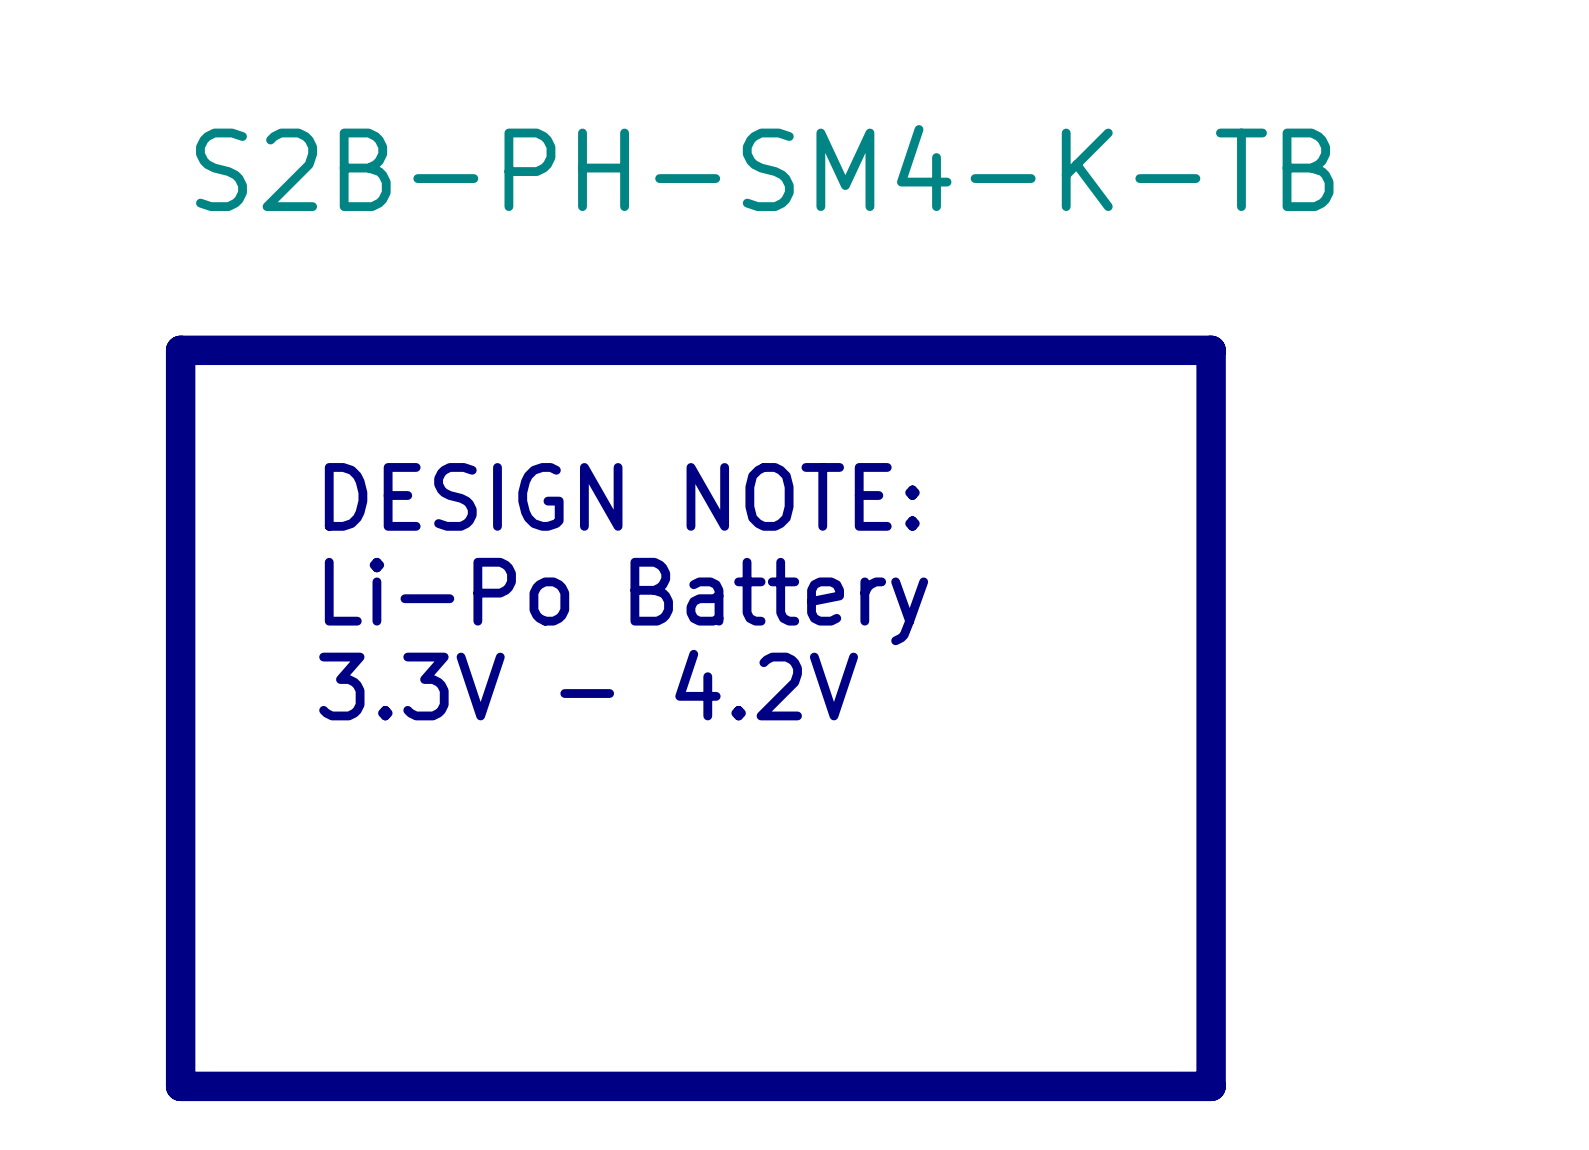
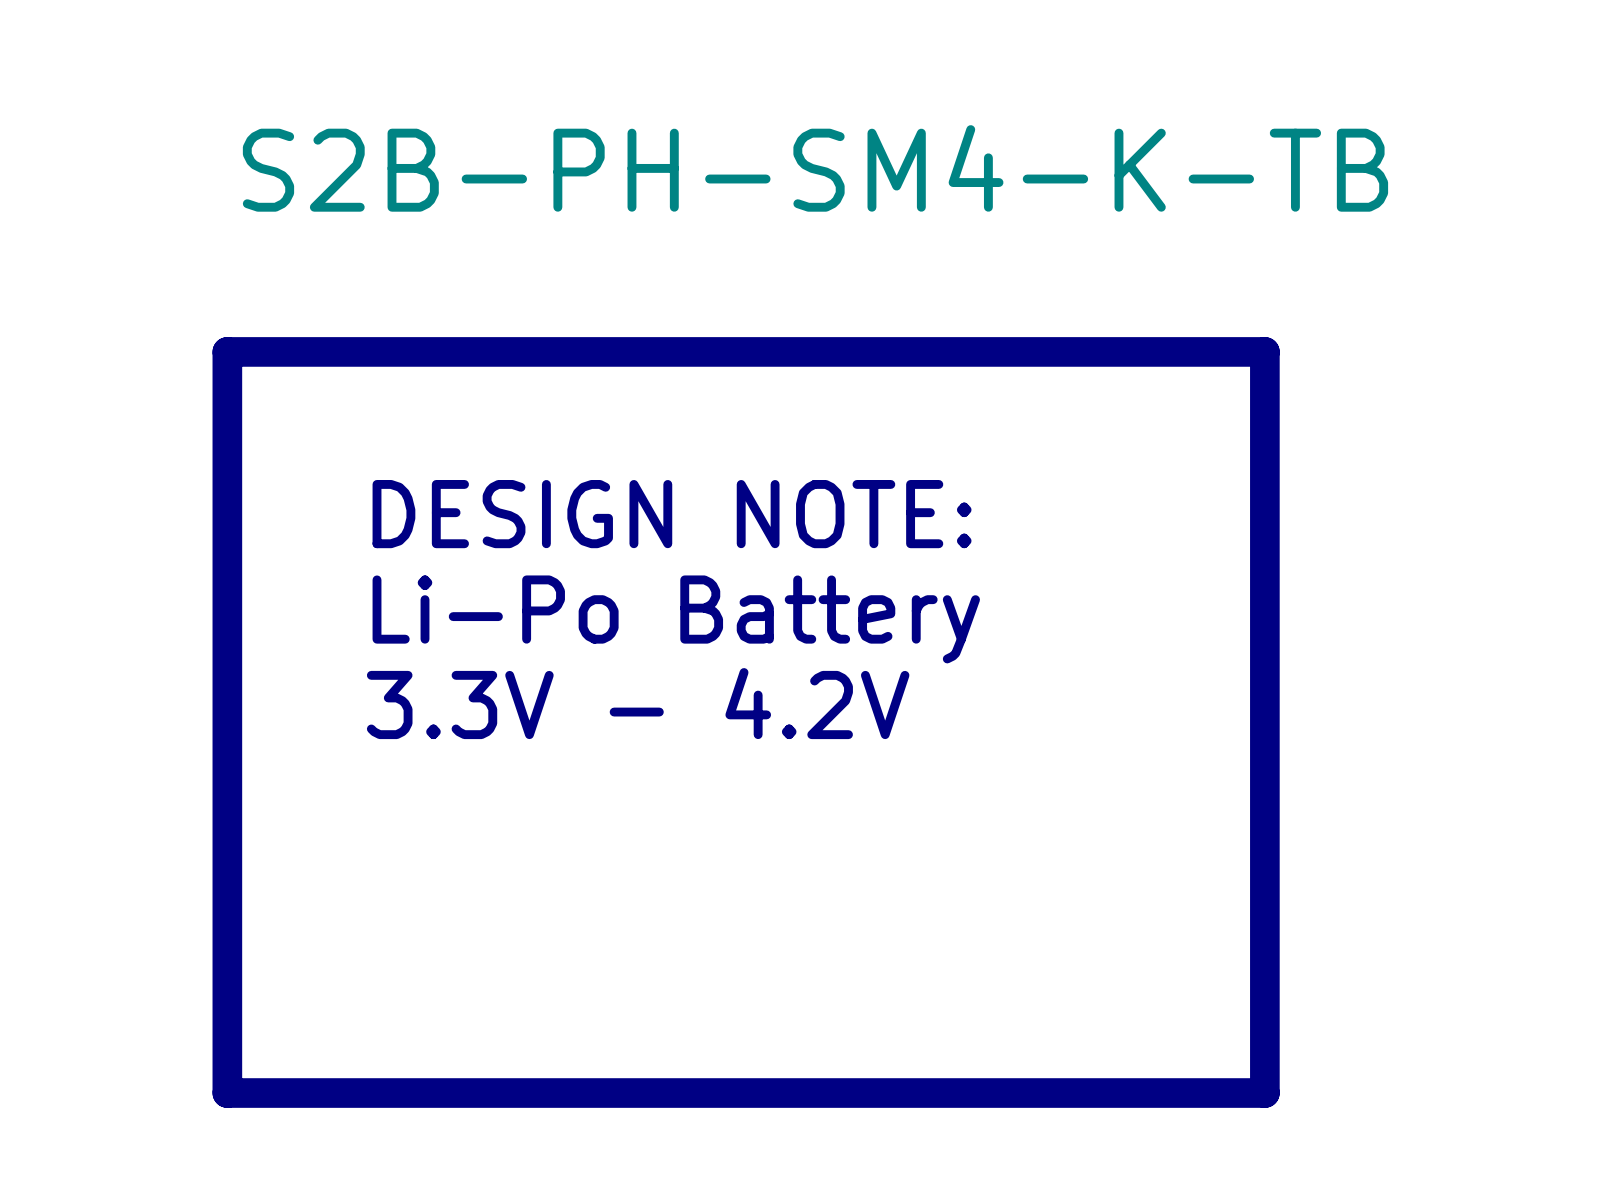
text position: DESIGN NOTE: (622, 496) -> DESIGN NOTE: (672, 514)
text position: Li-Po Battery (626, 601) -> Li-Po Battery (676, 619)
text position: 3.3V - 4.2V (588, 685) -> 3.3V - 4.2V (638, 703)

